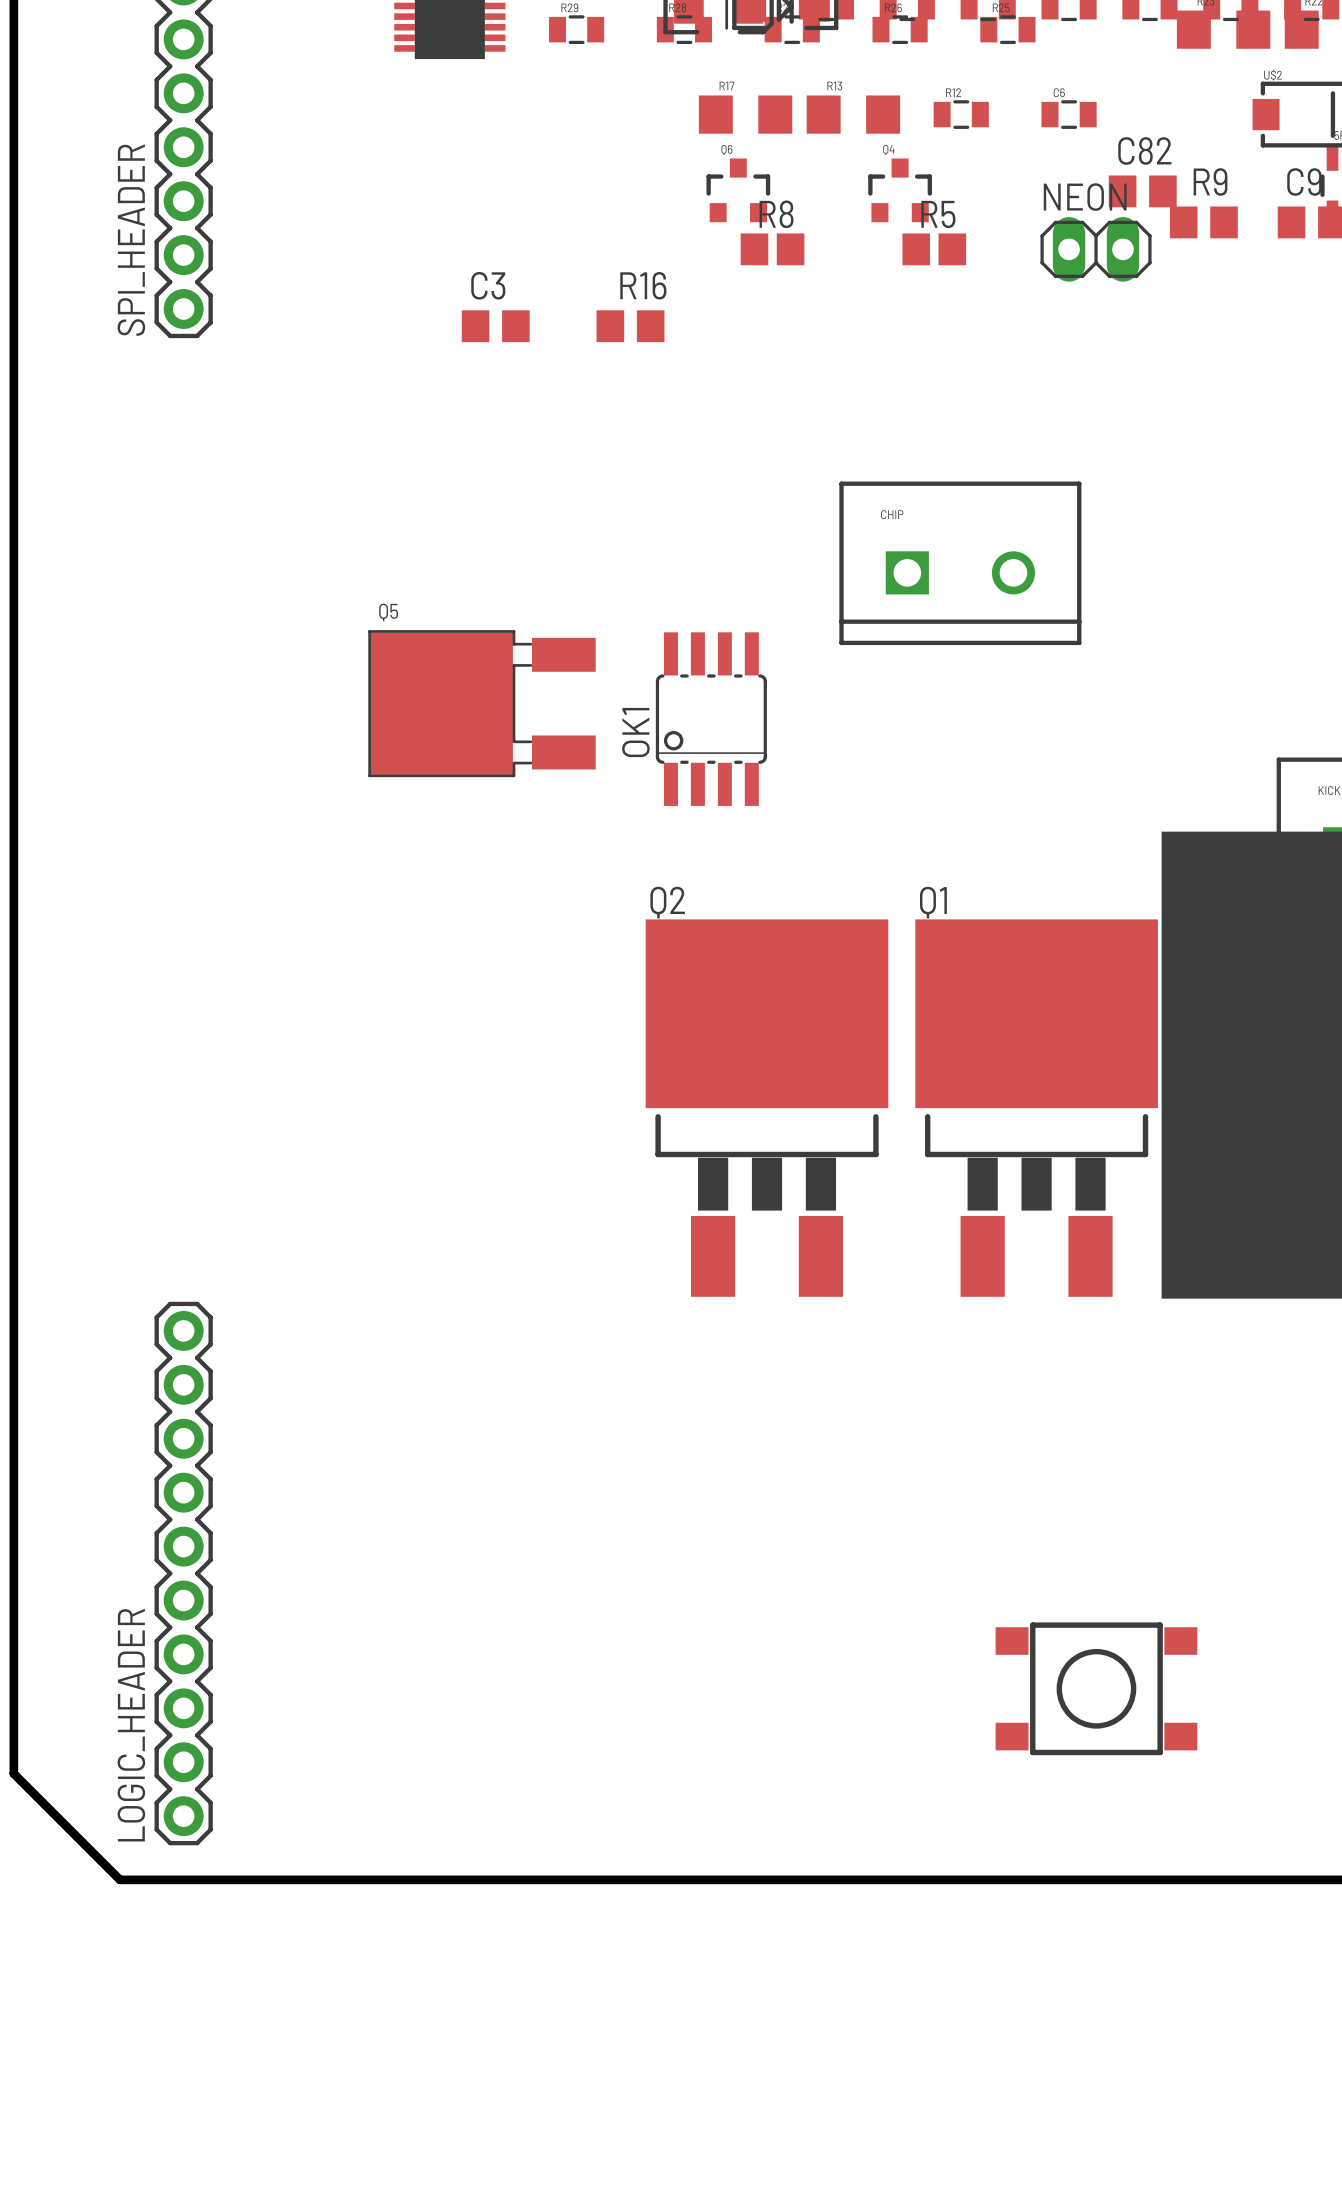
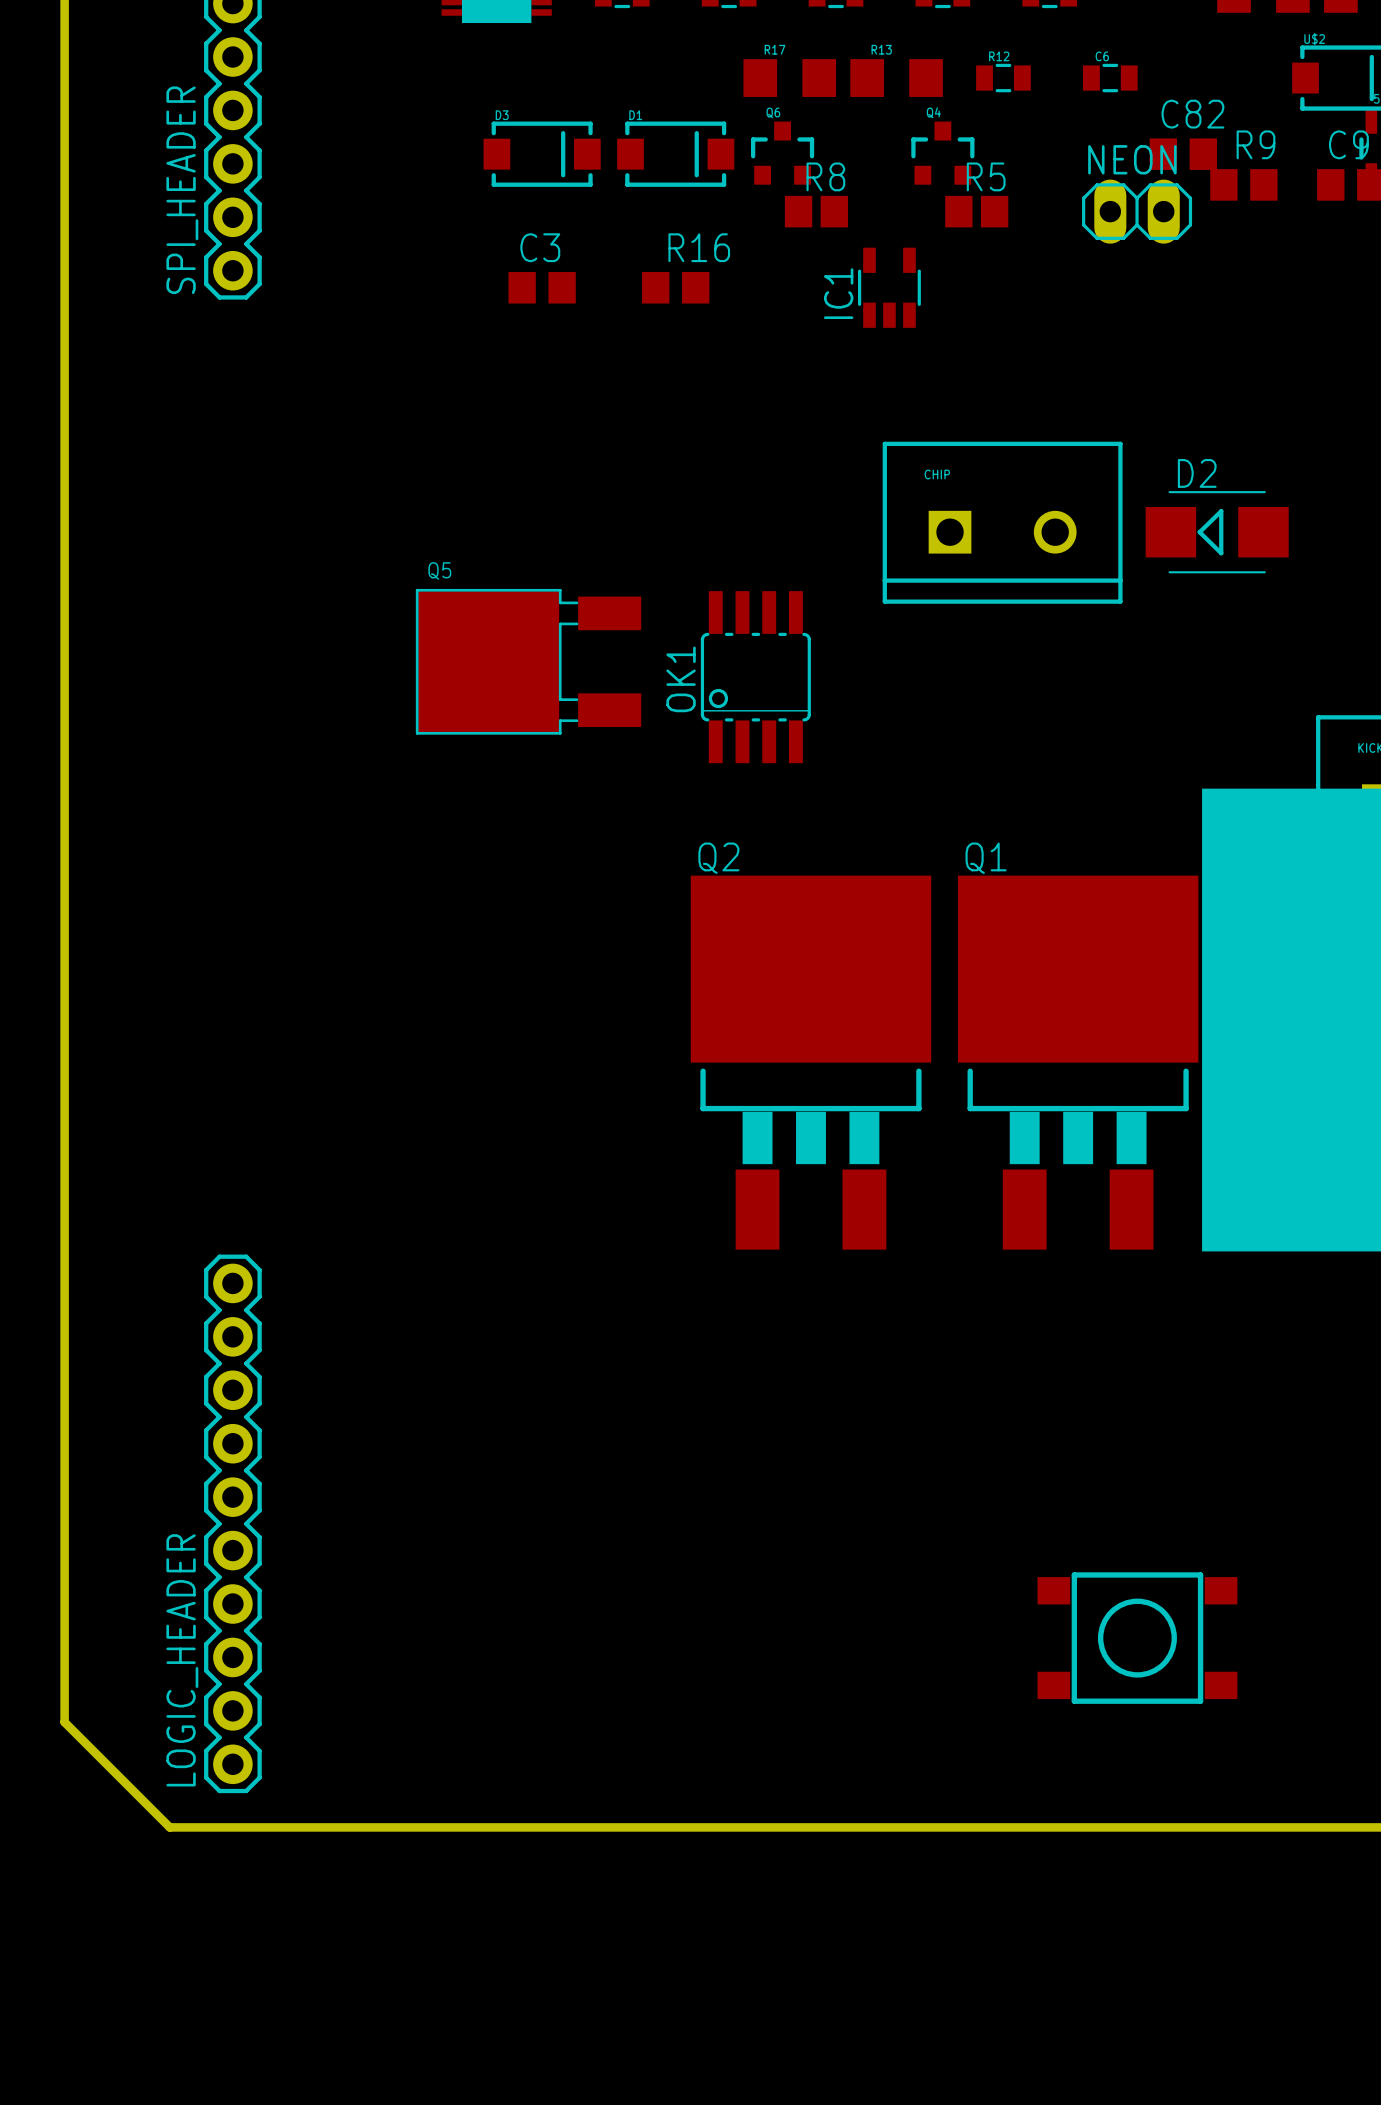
D3: none -> (542, 154)
D1: none -> (675, 154)
IC1: none -> (889, 287)
D2: none -> (1217, 532)

